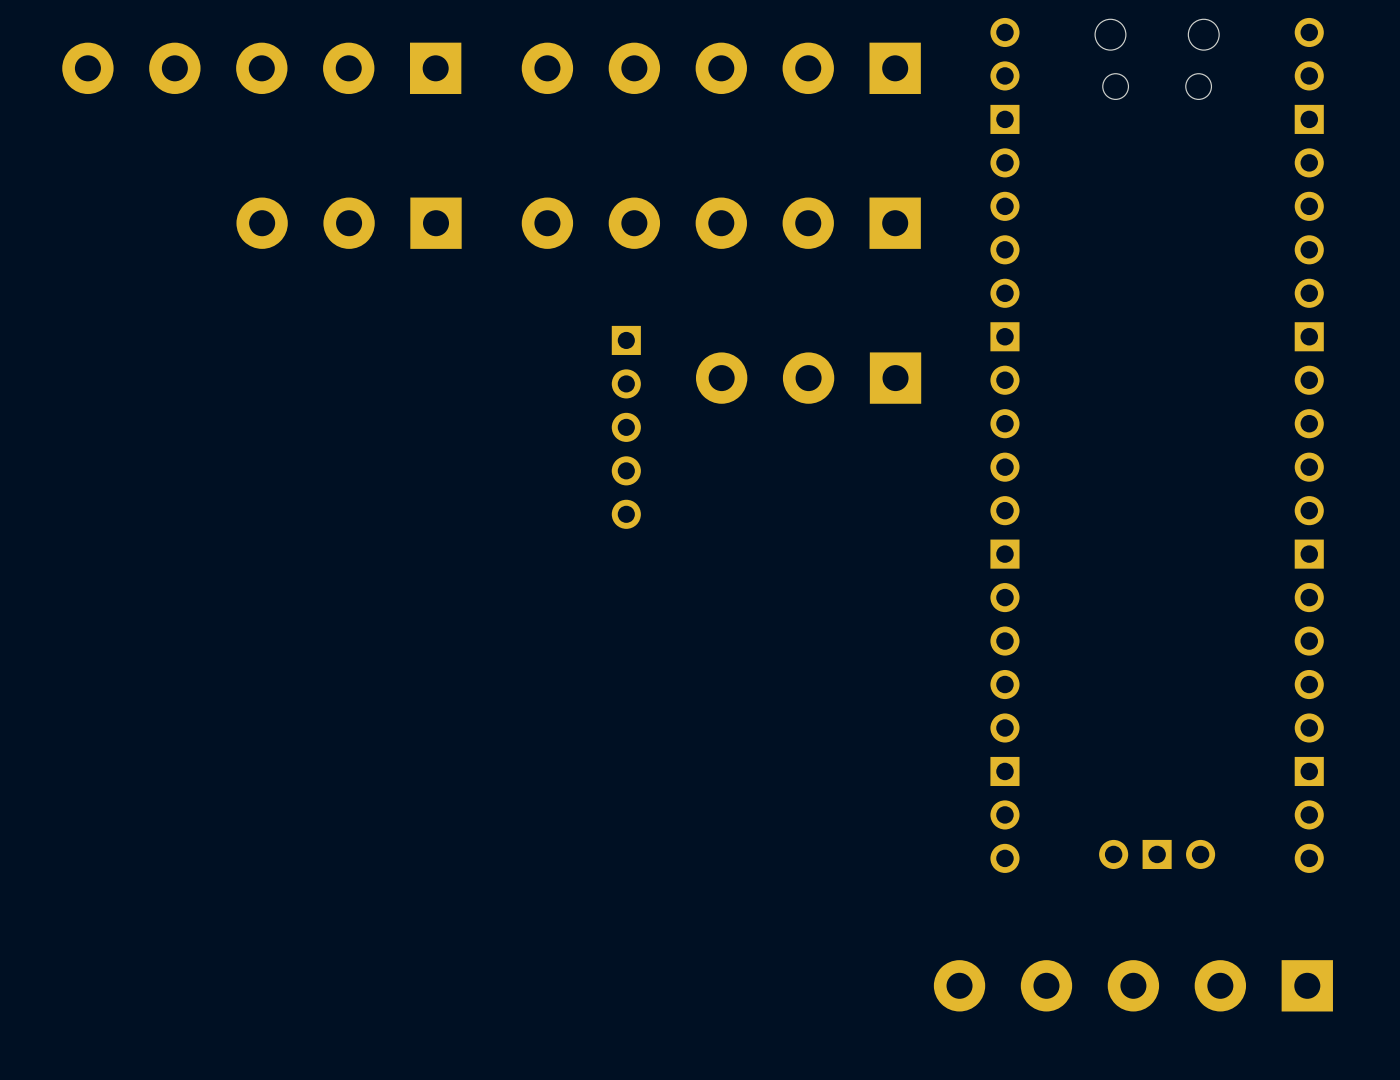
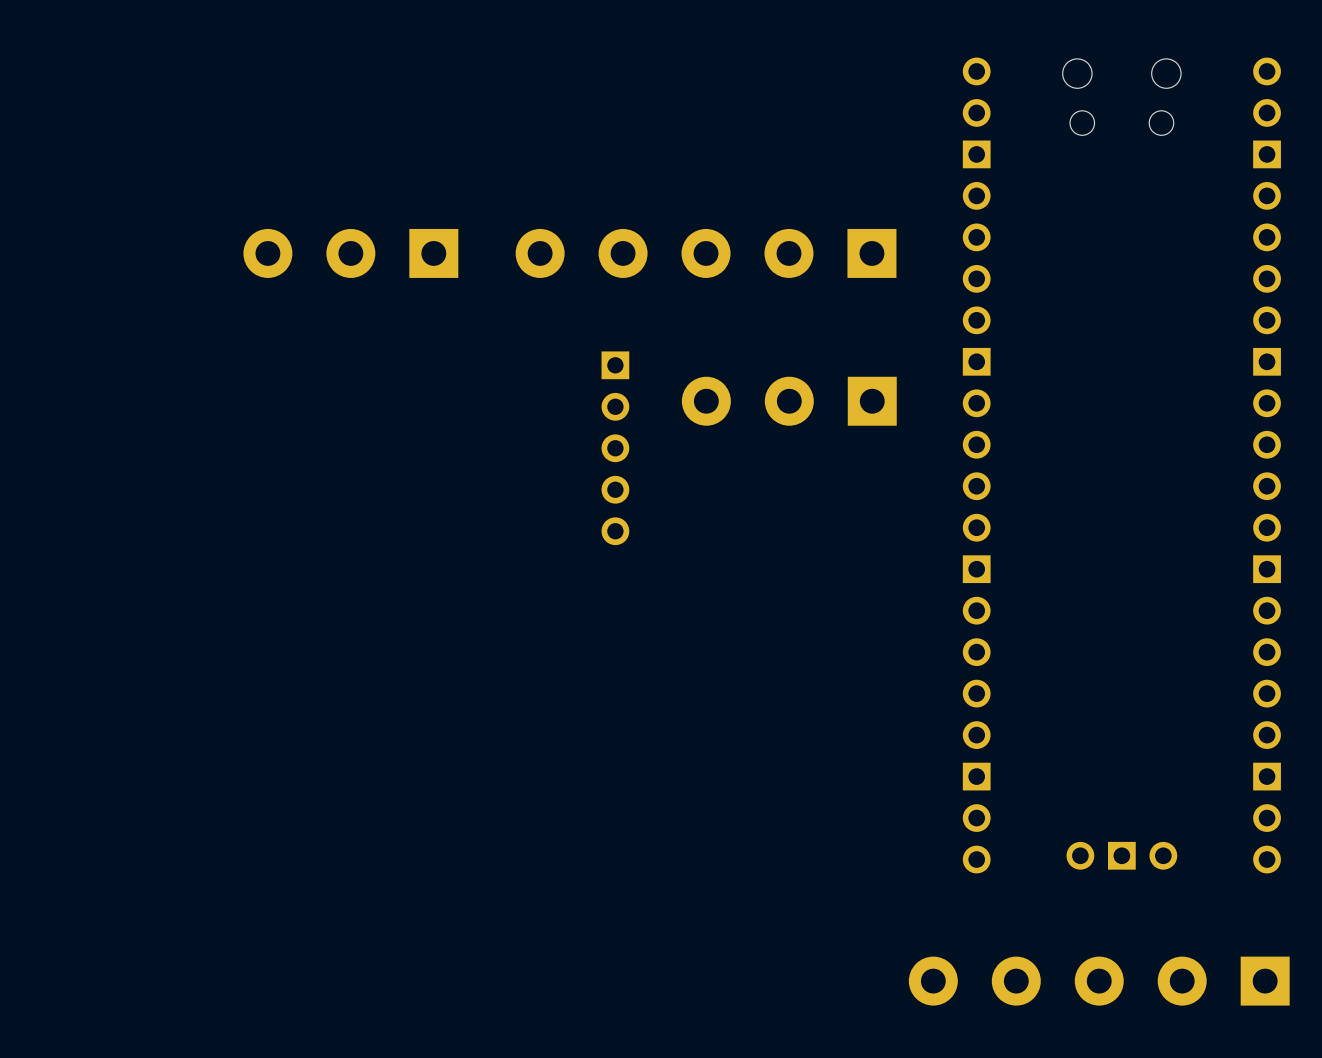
part: (261, 68) -> none
part: (721, 68) -> none

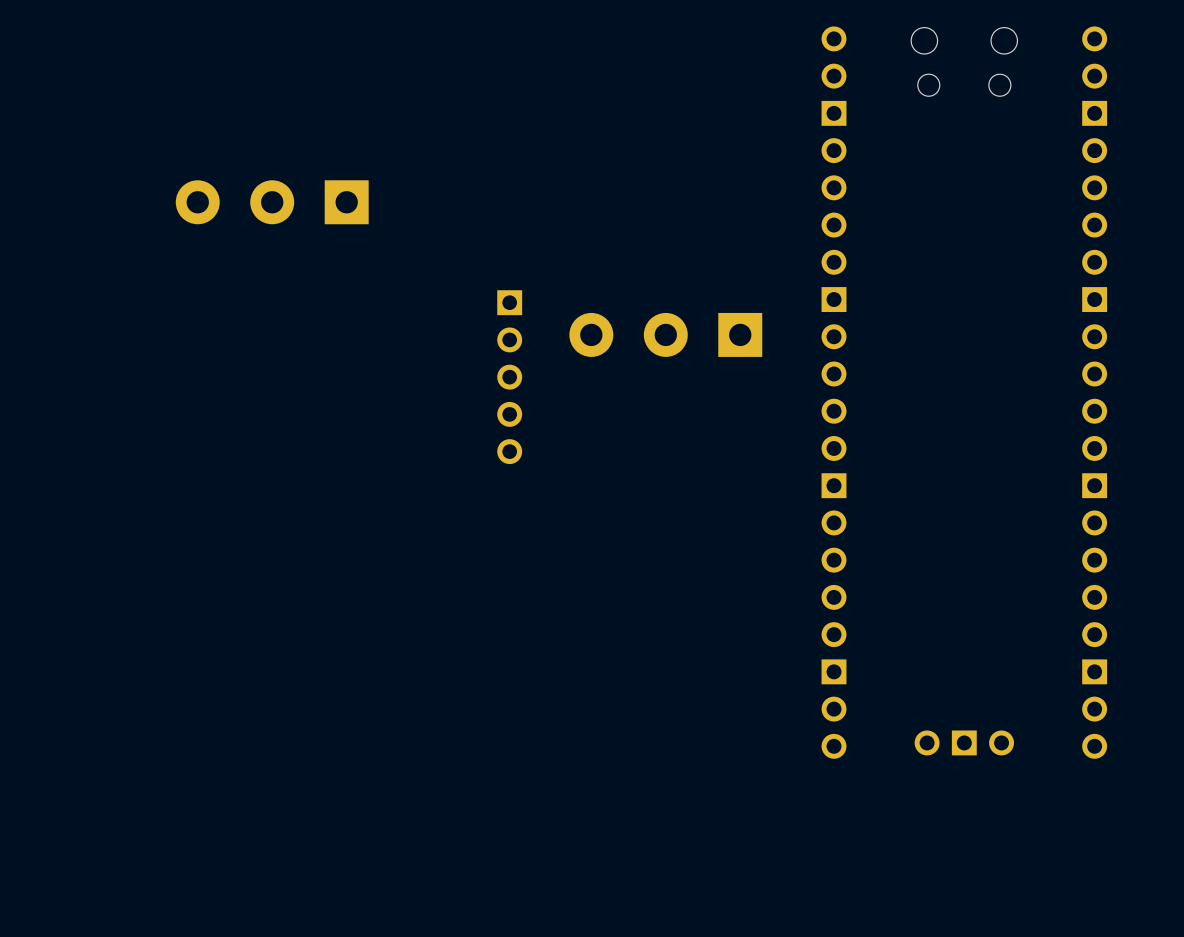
part: (706, 253) -> none
part: (1099, 981) -> none

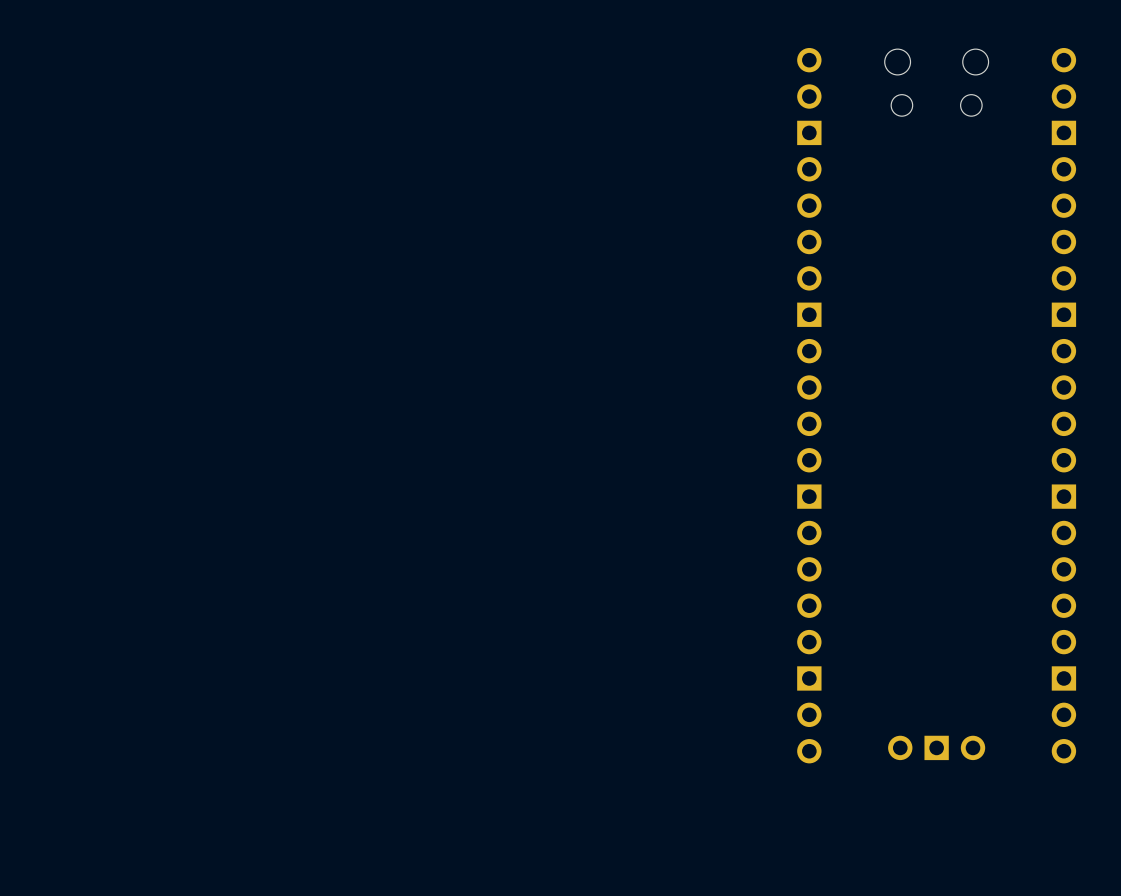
part: (272, 202) -> none
part: (665, 334) -> none
part: (509, 377) -> none

